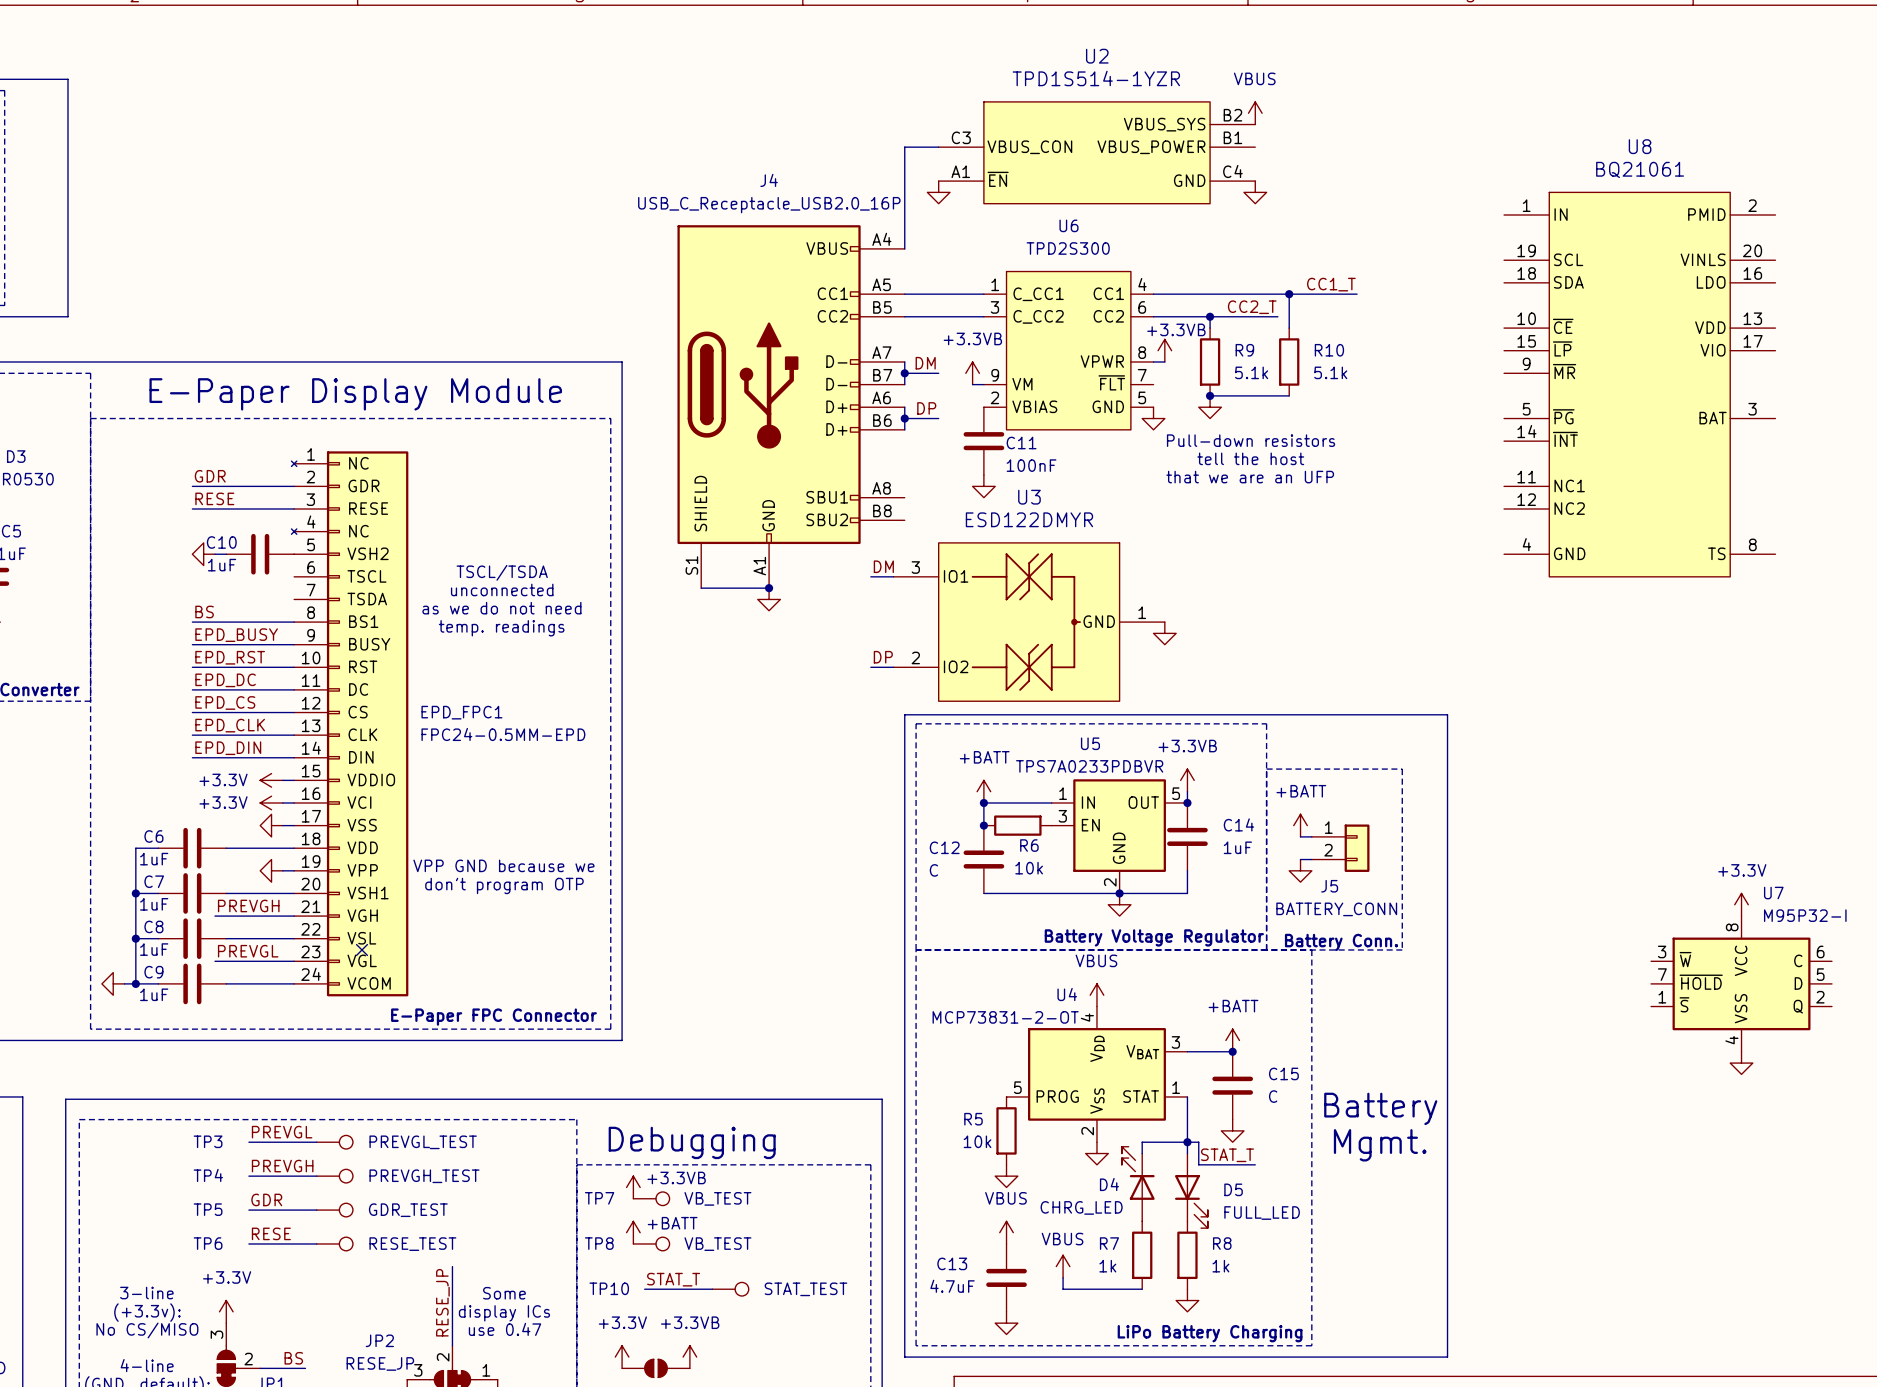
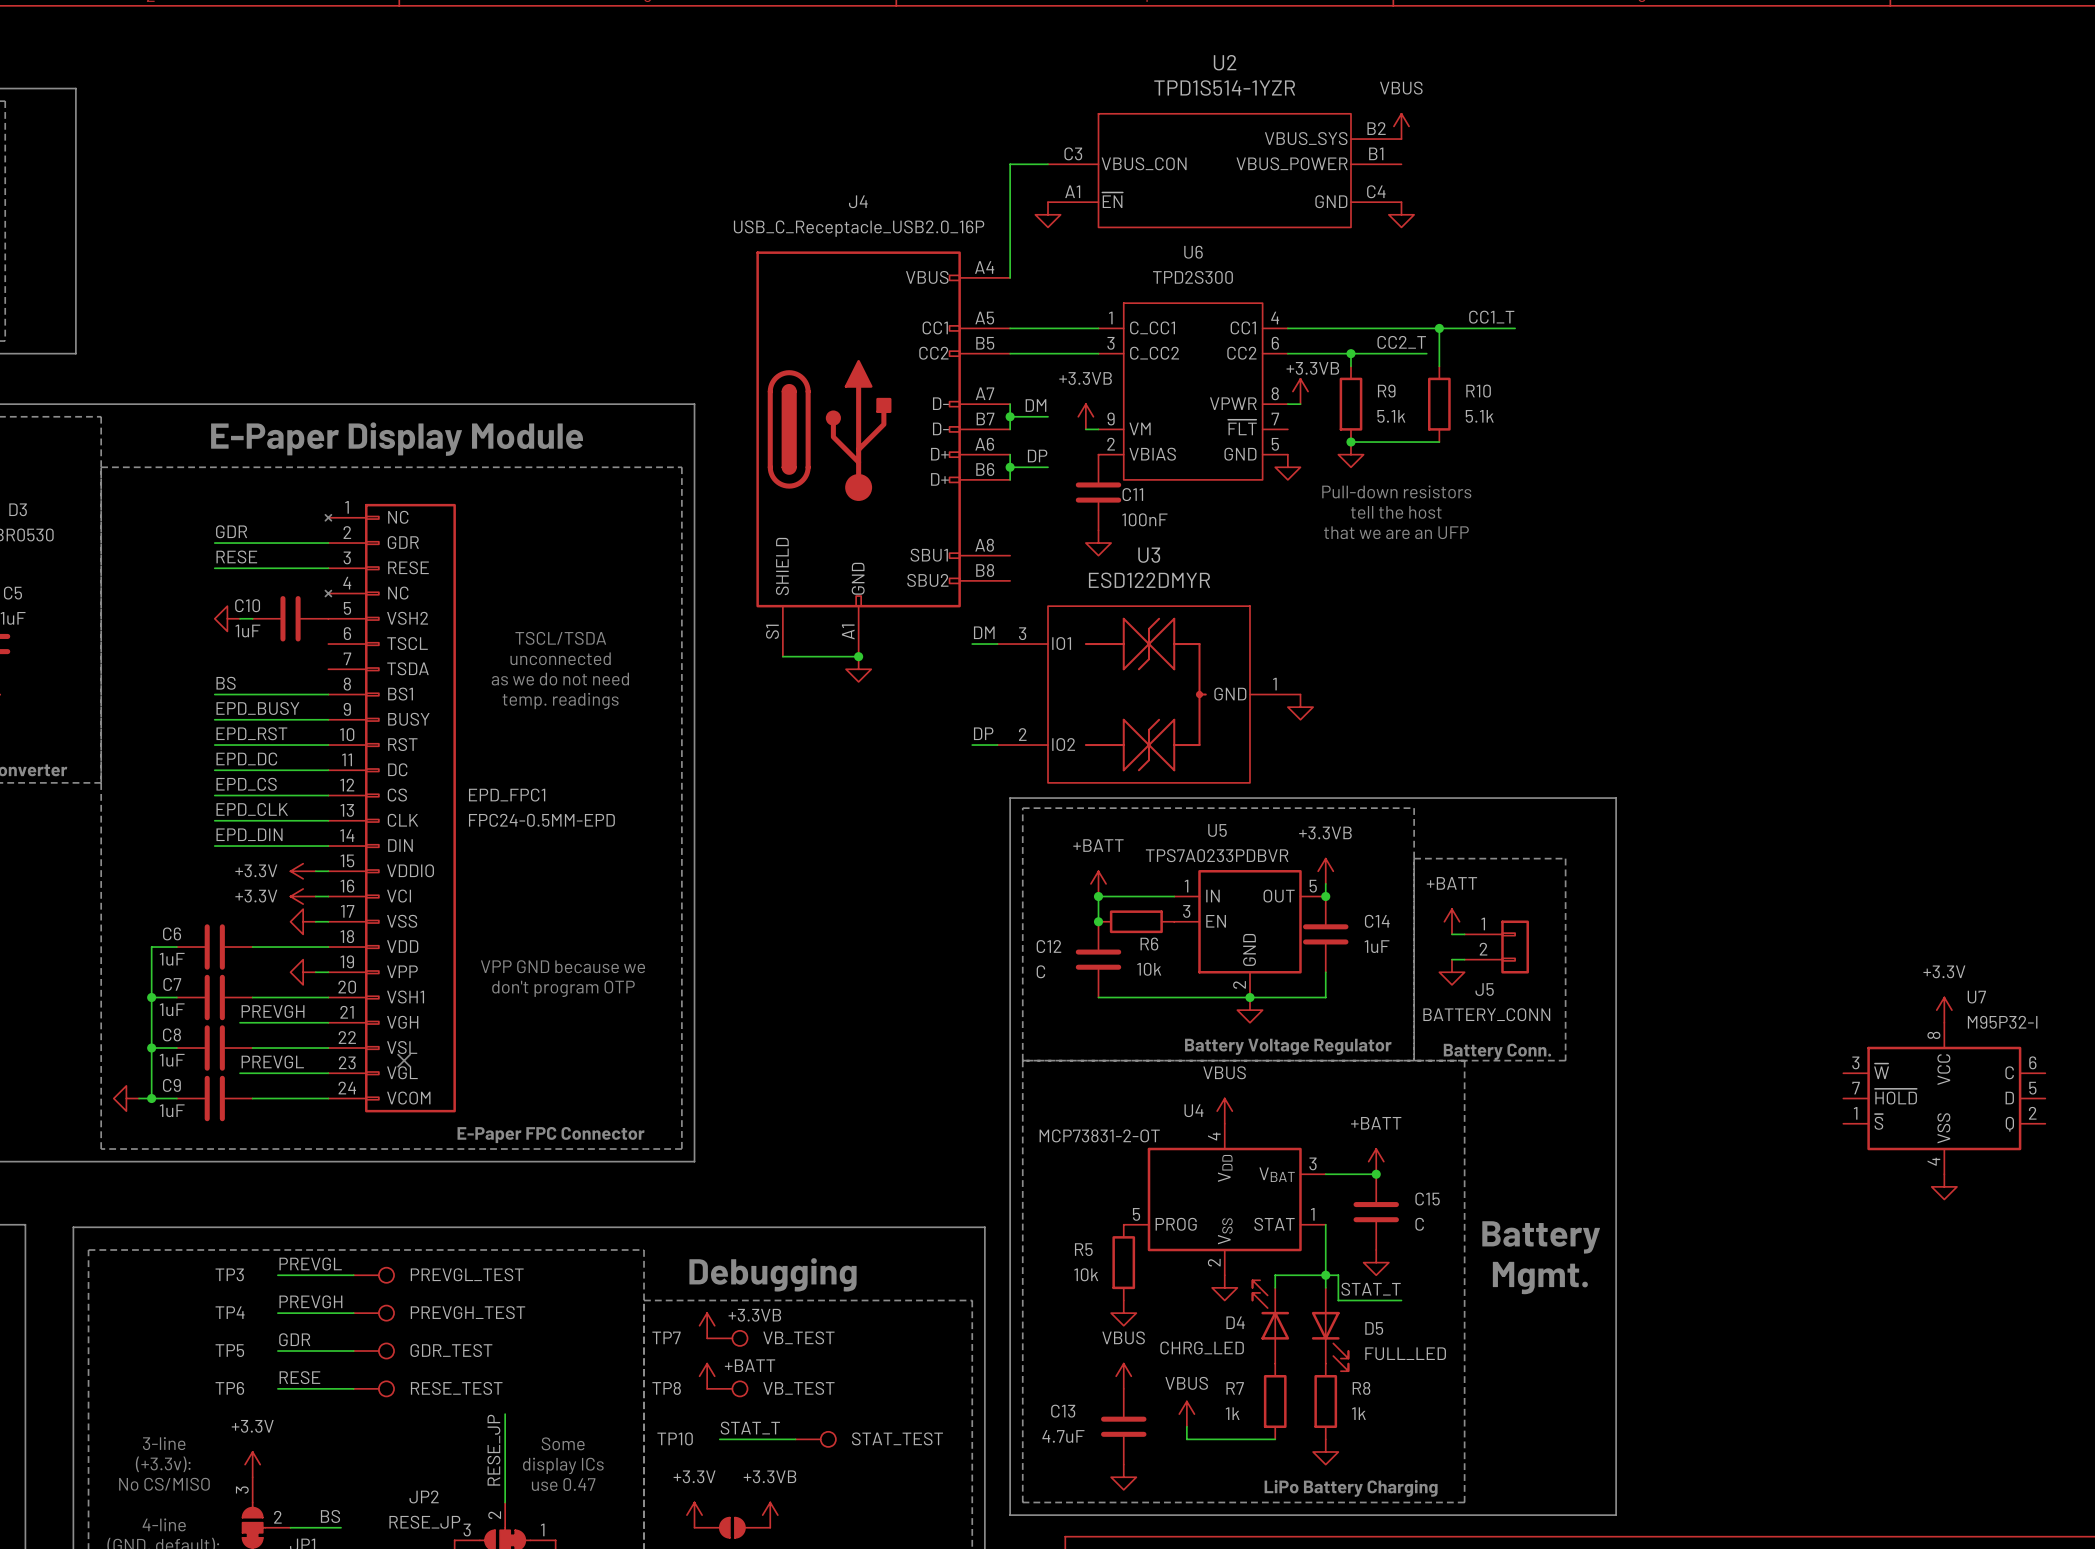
U8: BQ21061 (1639, 384) -> none

